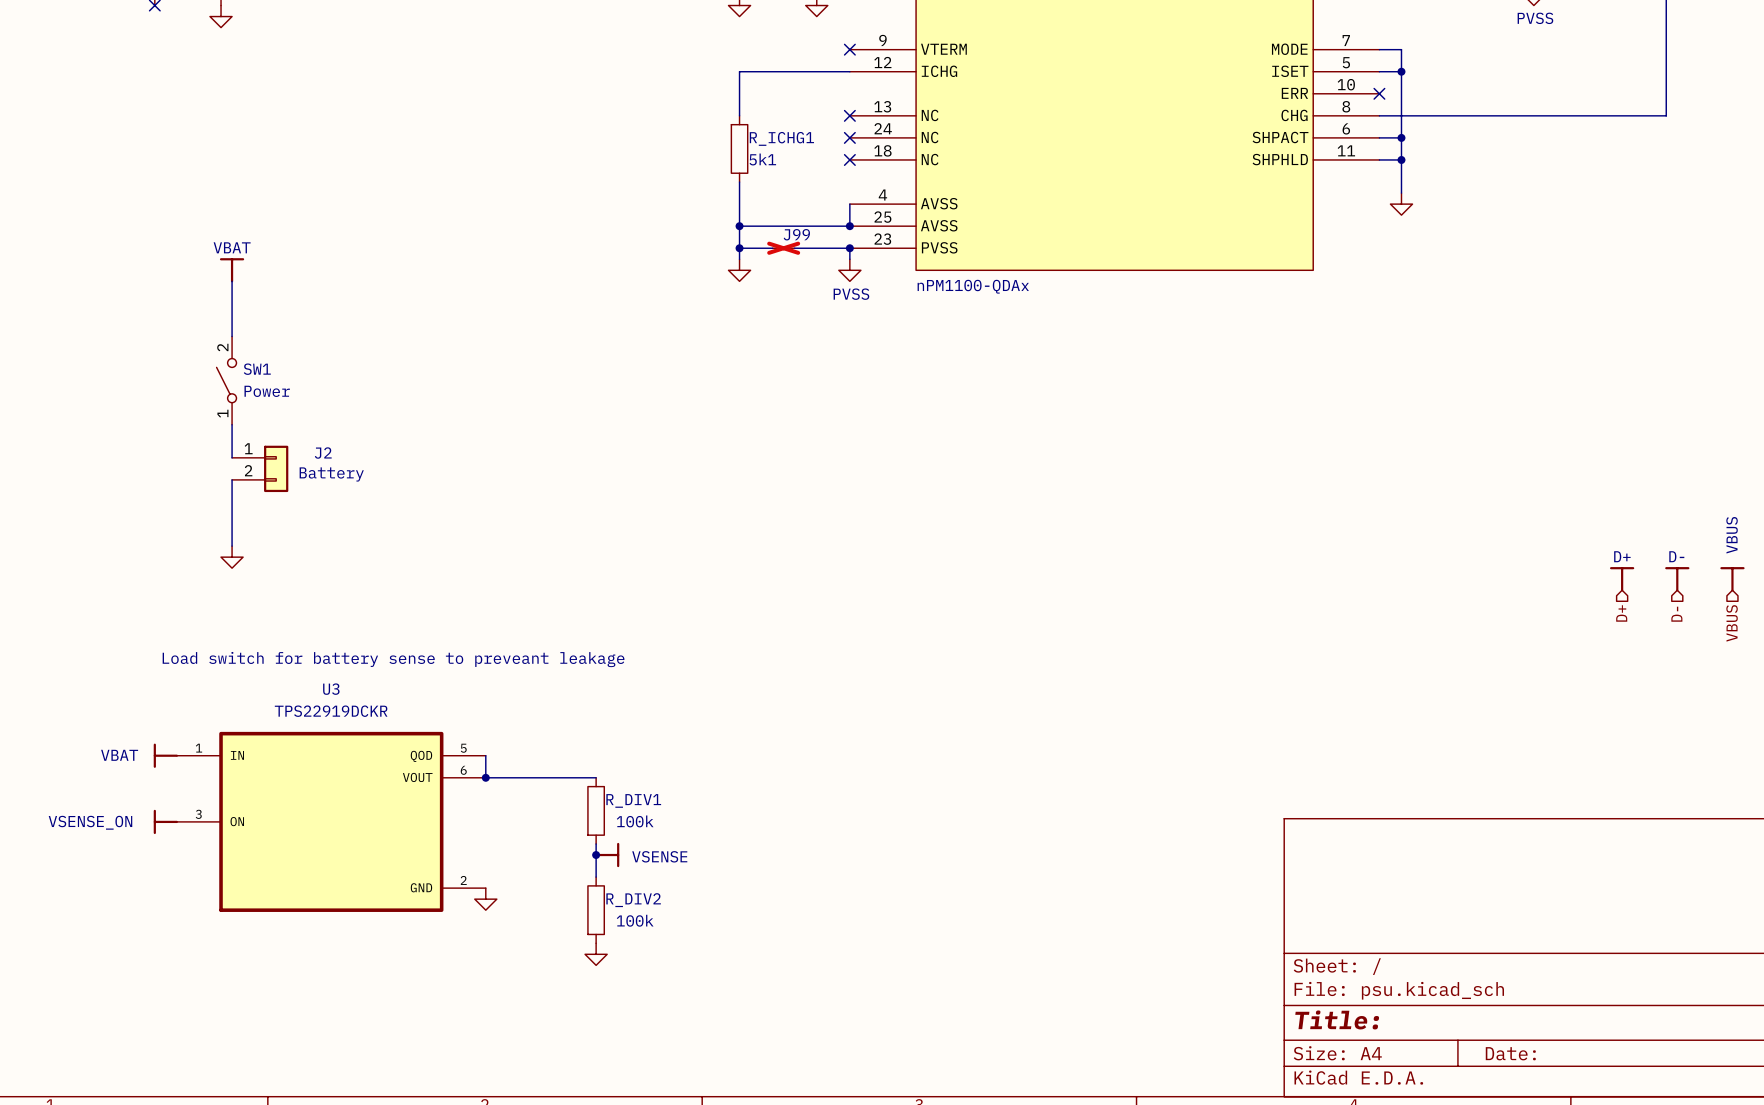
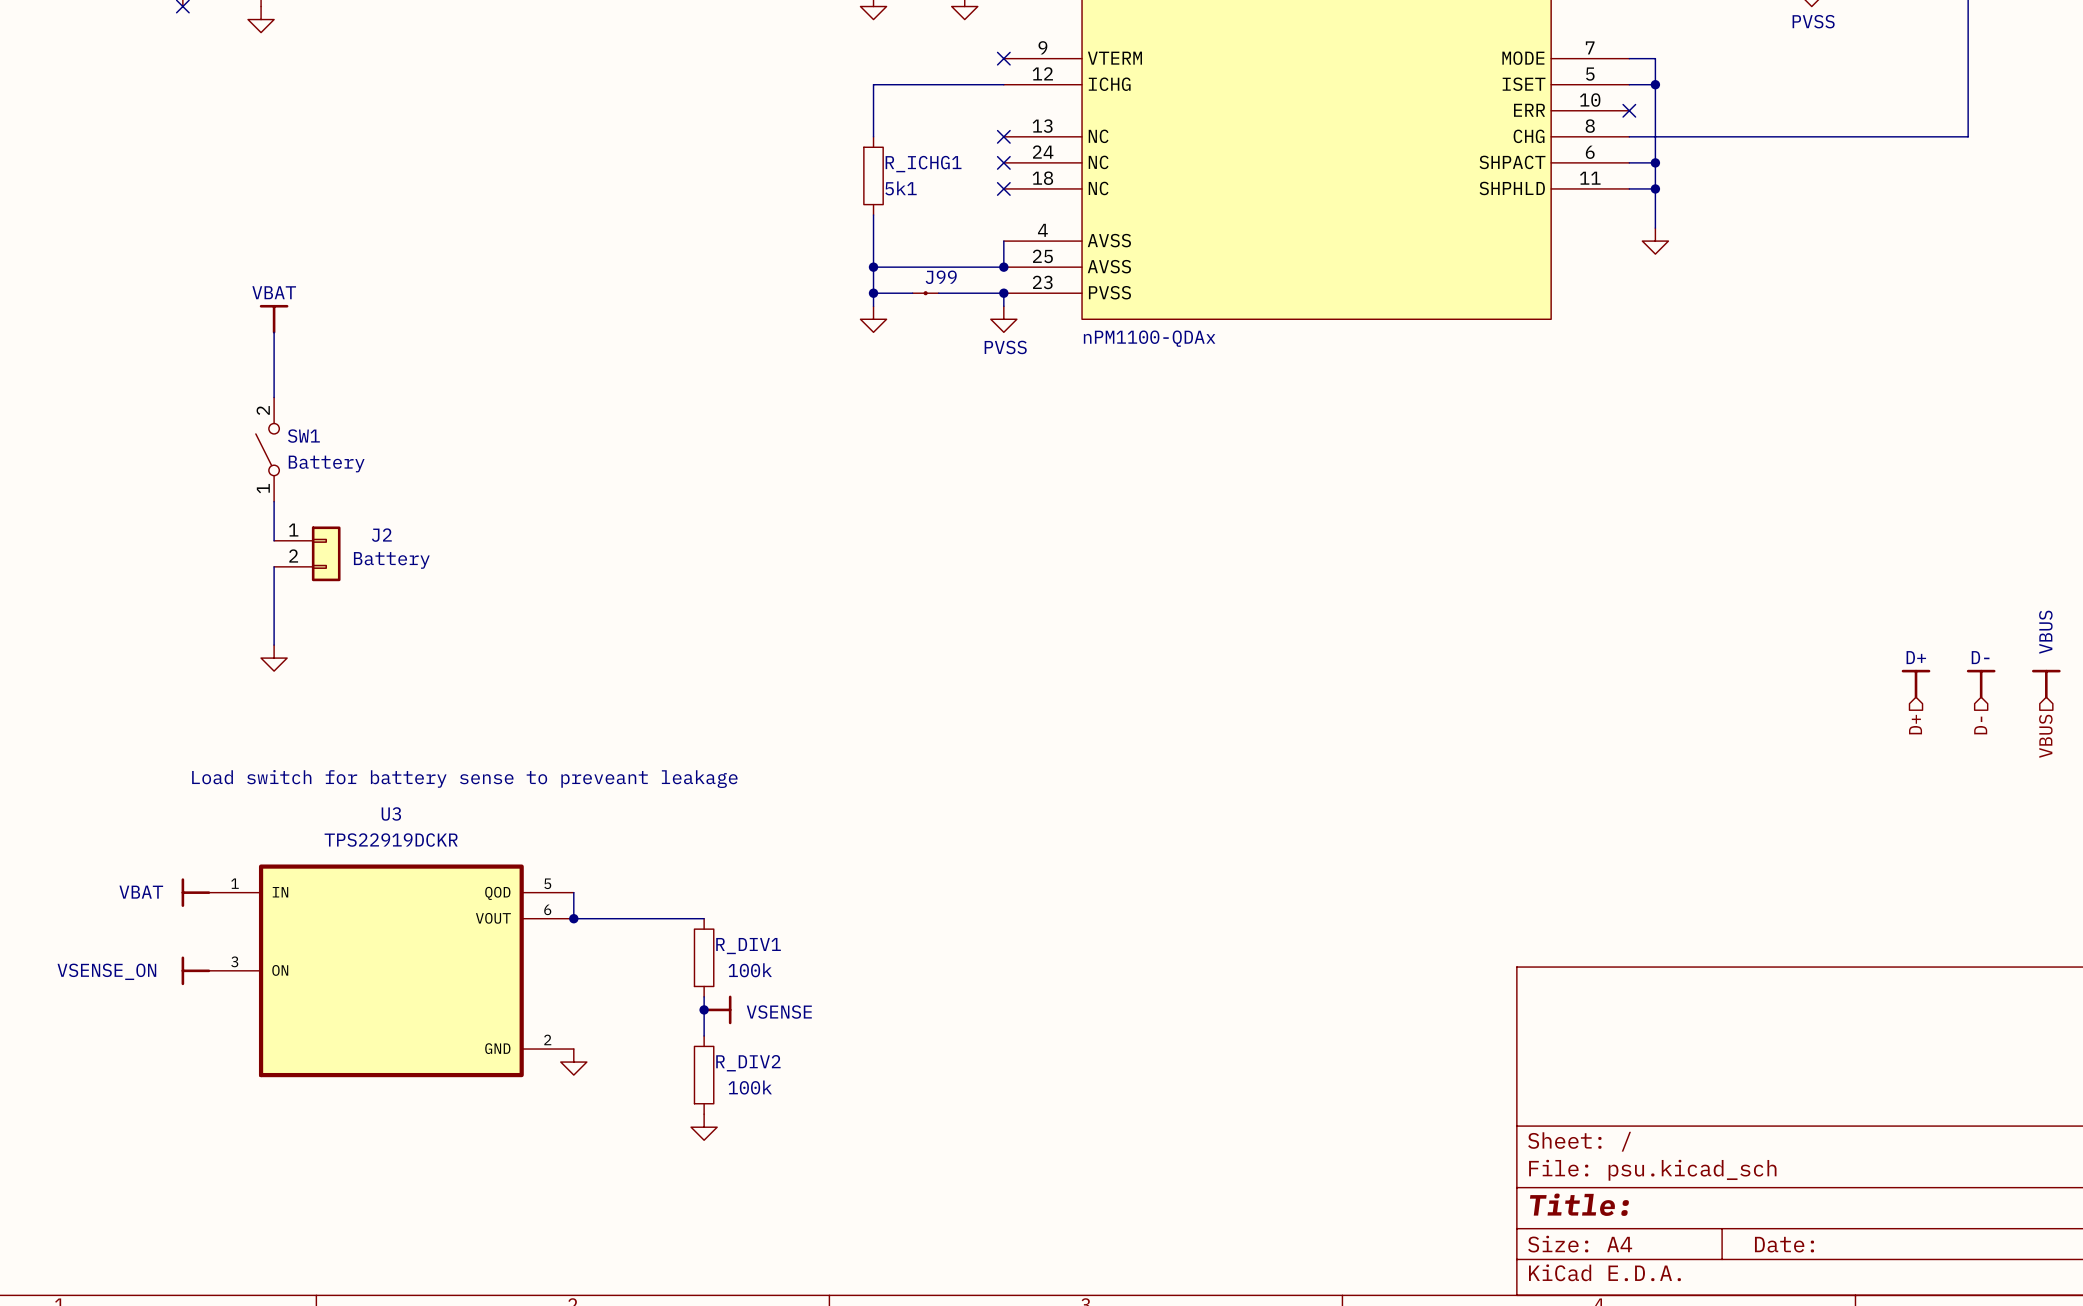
J99 do-not-place cross: (783, 248) -> none
SW1 value: Power (267, 391) -> Battery (326, 463)

